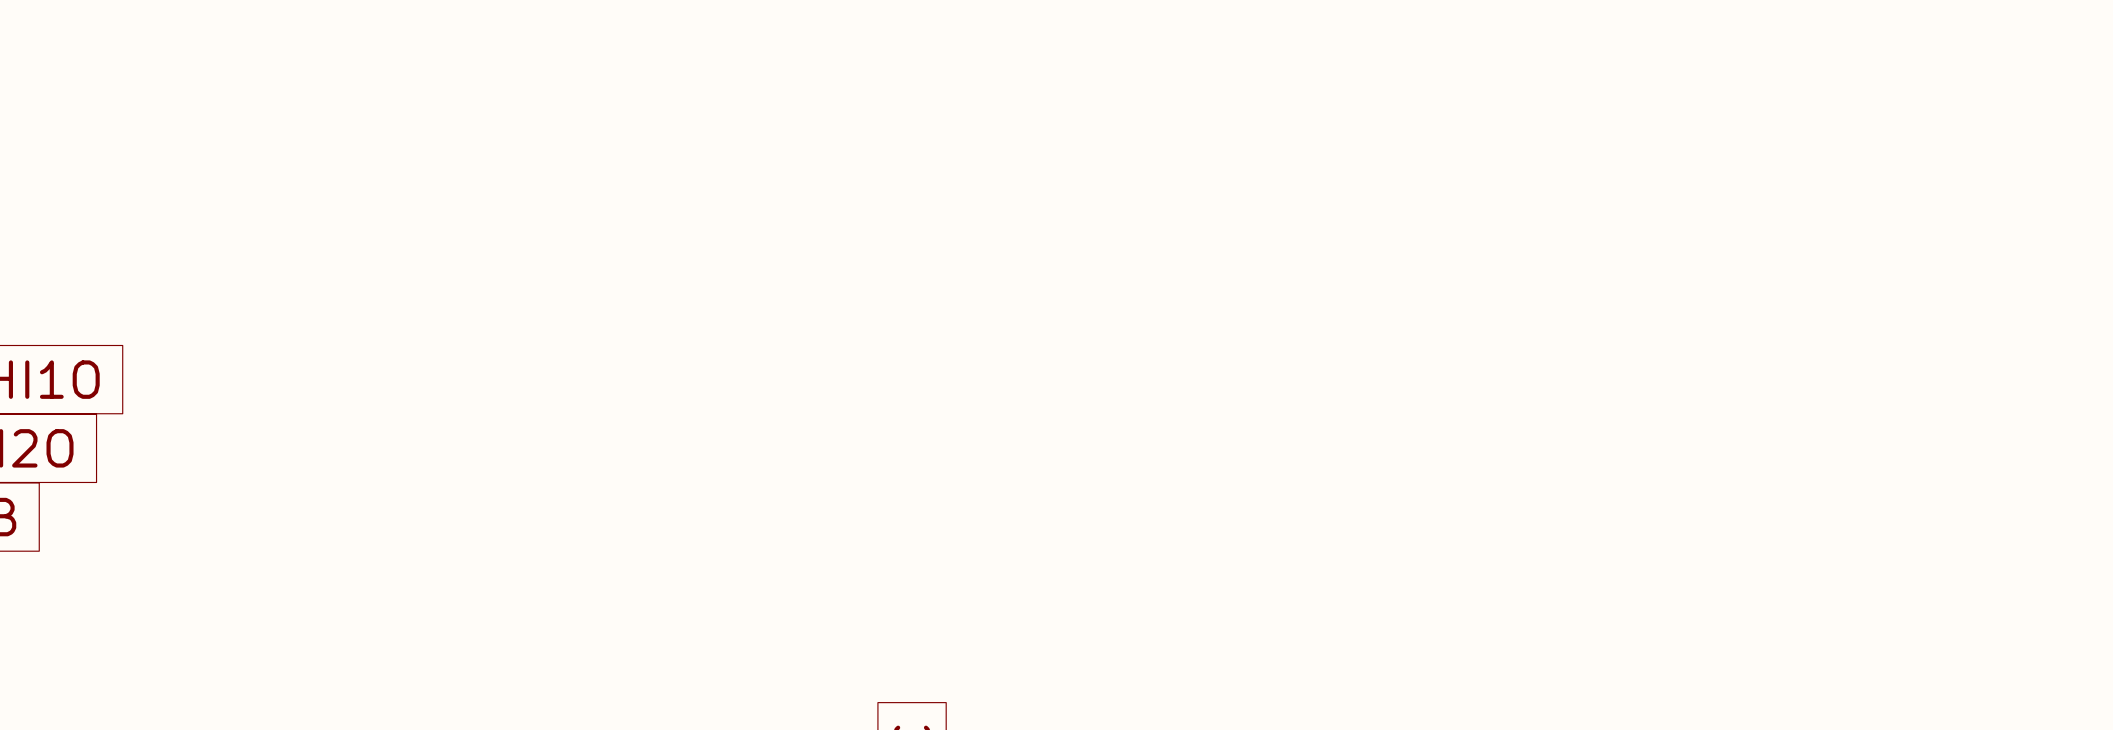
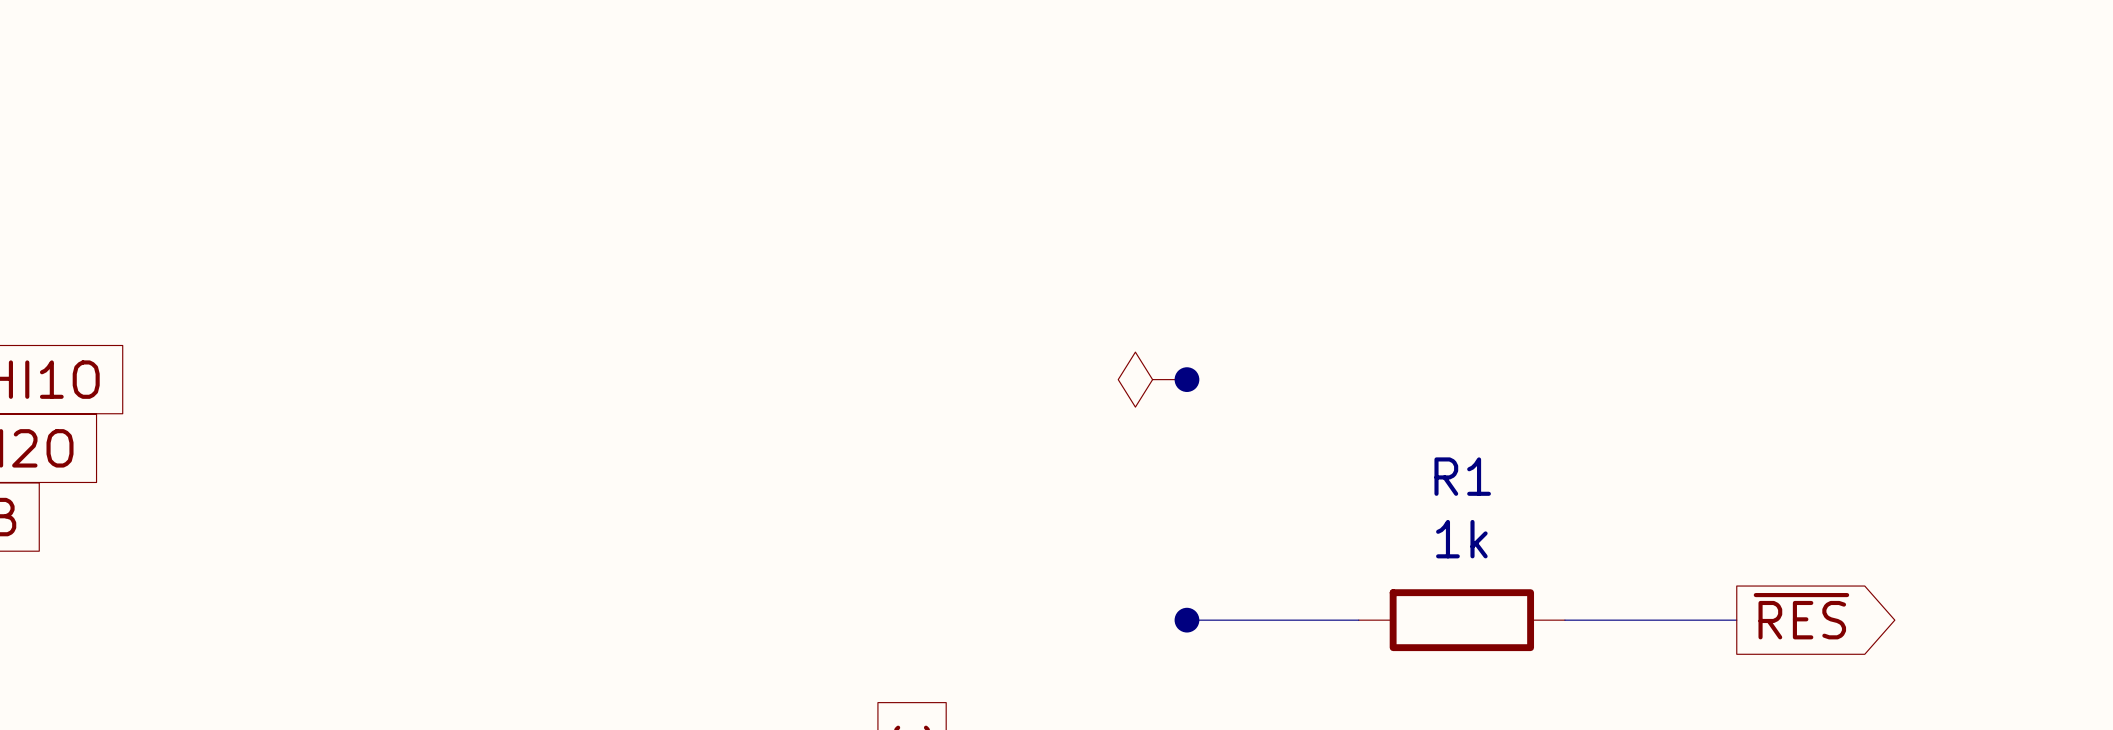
power symbol: none -> (1152, 379)
junction: none -> (1186, 379)
global label: none -> ~{RES} (1801, 616)
wire: none -> (1186, 620) (1358, 620)
junction: none -> (1186, 620)
R1: none -> 1k (1461, 620)
wire: none -> (1564, 620) (1736, 620)

